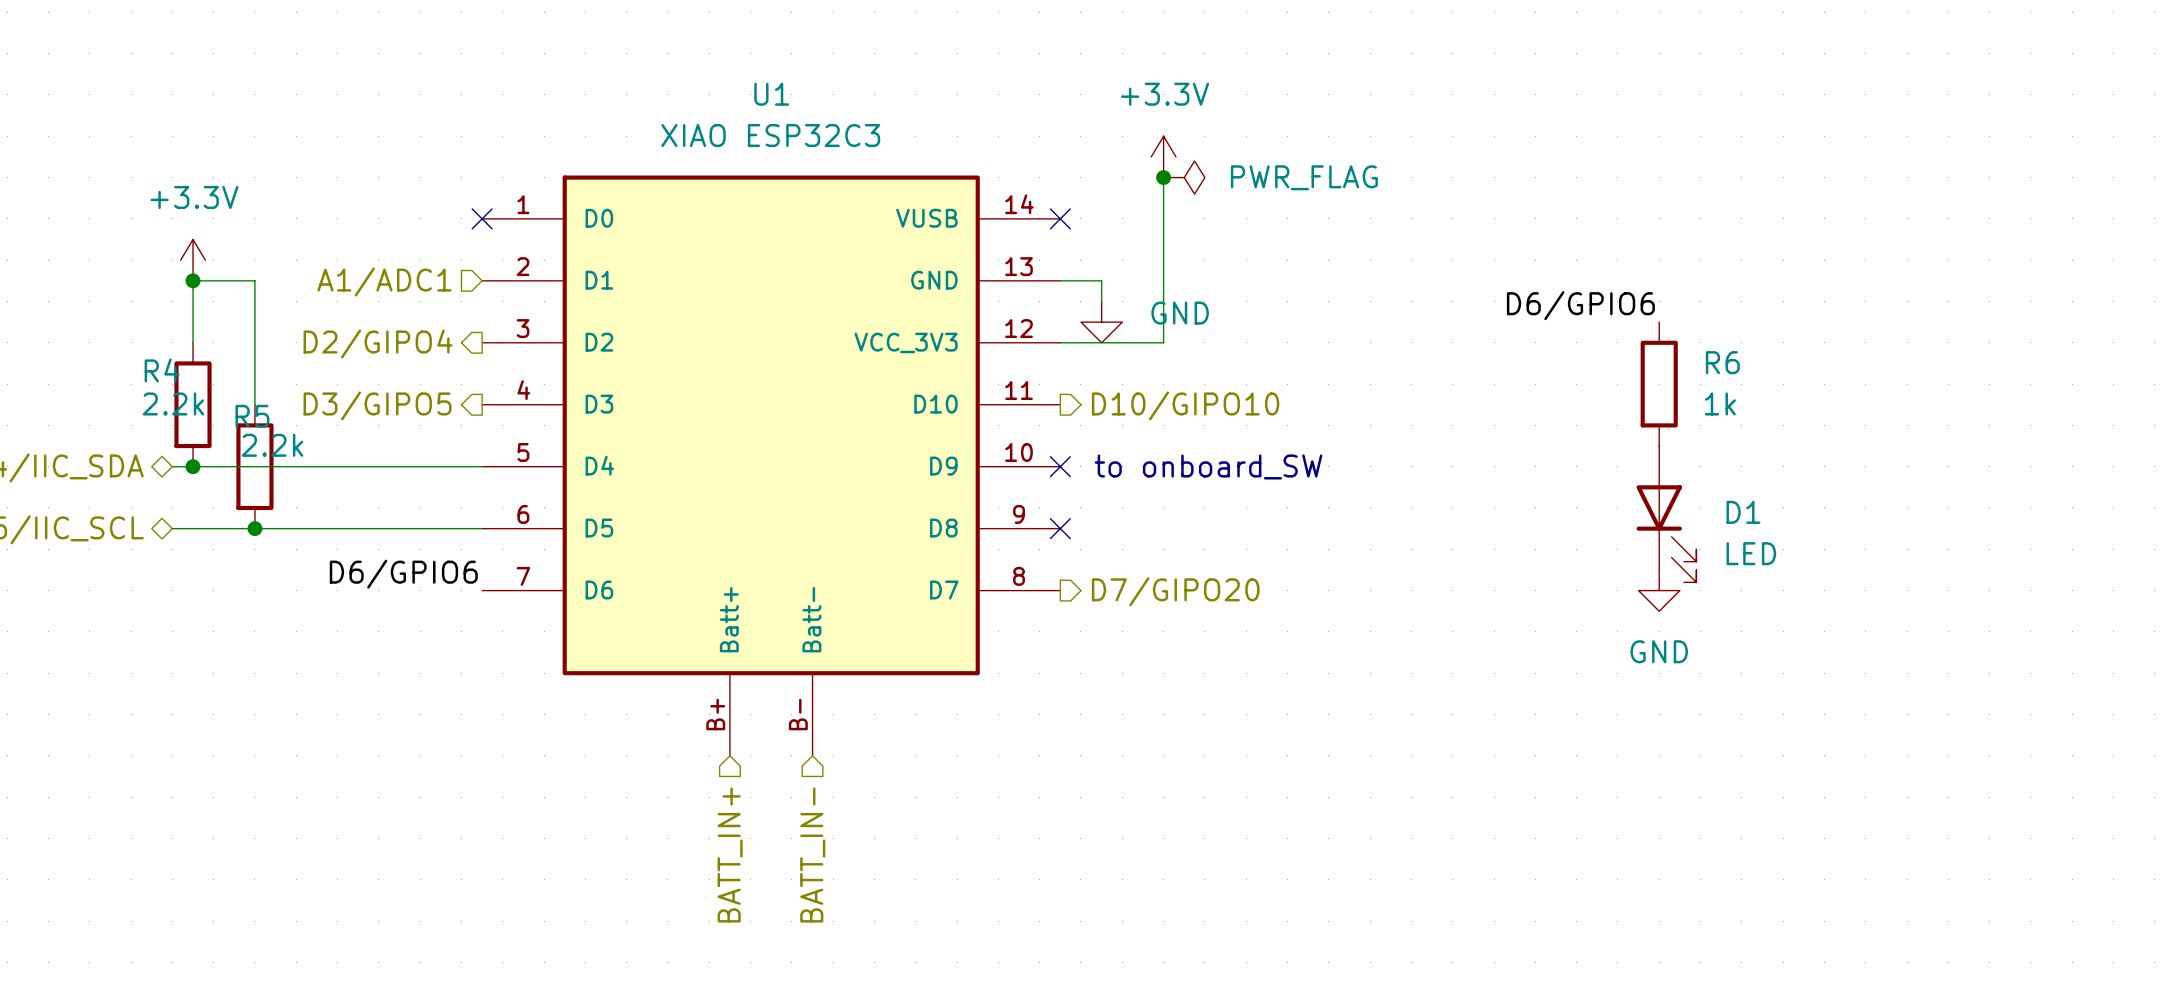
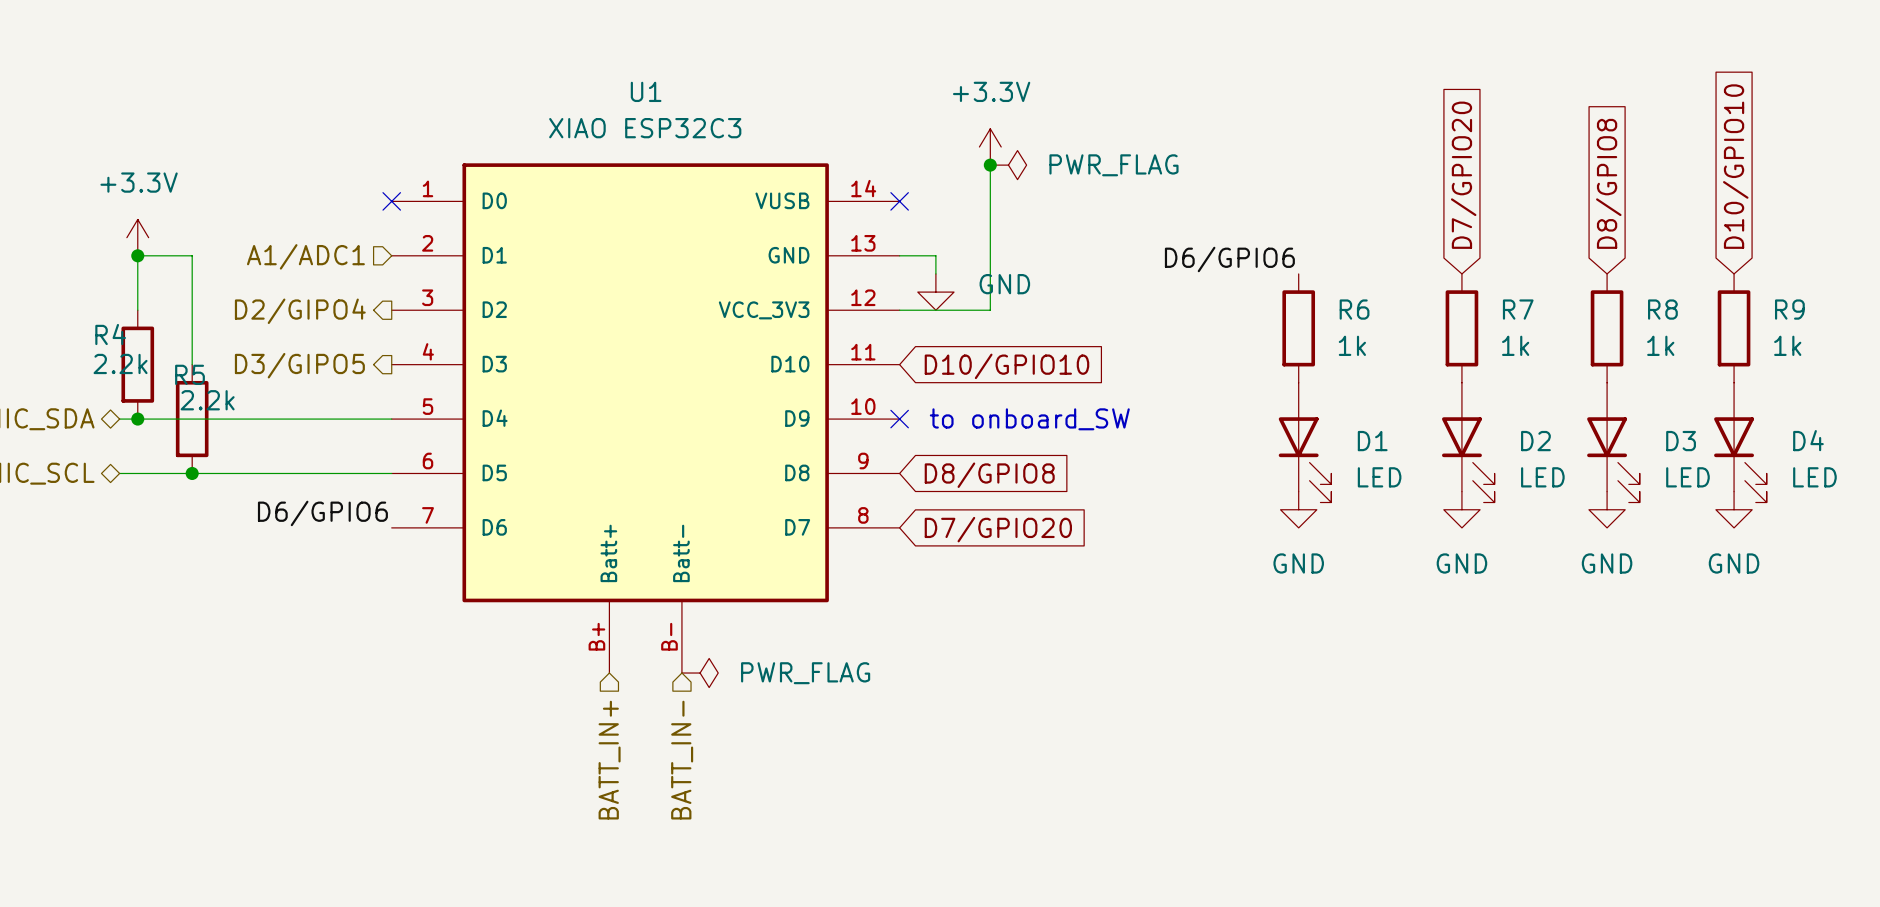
global label: none -> D10/GPIO10 (1735, 166)
global label: none -> D7/GPIO20 (1463, 175)
global label: none -> D8/GPIO8 (1608, 183)
label position: D6/GPIO6 (1580, 305) -> D6/GPIO6 (1229, 259)
R7: none -> 1k (1461, 328)
R8: none -> 1k (1607, 328)
R9: none -> 1k (1734, 328)
R6 position: (1659, 384) -> (1298, 328)
hierarchical label: D10/GIPO10 (1185, 405) -> none
global label: none -> D10/GPIO10 (1006, 366)
D2: none -> LED (1468, 442)
D3: none -> LED (1613, 442)
D4: none -> LED (1740, 442)
D1 position: (1666, 514) -> (1305, 442)
no-connect mark: (1060, 528) -> none
global label: none -> D8/GPIO8 (989, 475)
power symbol: none -> GND (1298, 509)
power symbol: none -> GND (1607, 509)
power symbol: none -> GND (1734, 509)
power symbol position: GND (1659, 590) -> GND (1461, 509)
hierarchical label: D7/GIPO20 (1175, 591) -> none
global label: none -> D7/GPIO20 (998, 529)
power symbol: none -> PWR_FLAG (700, 673)

